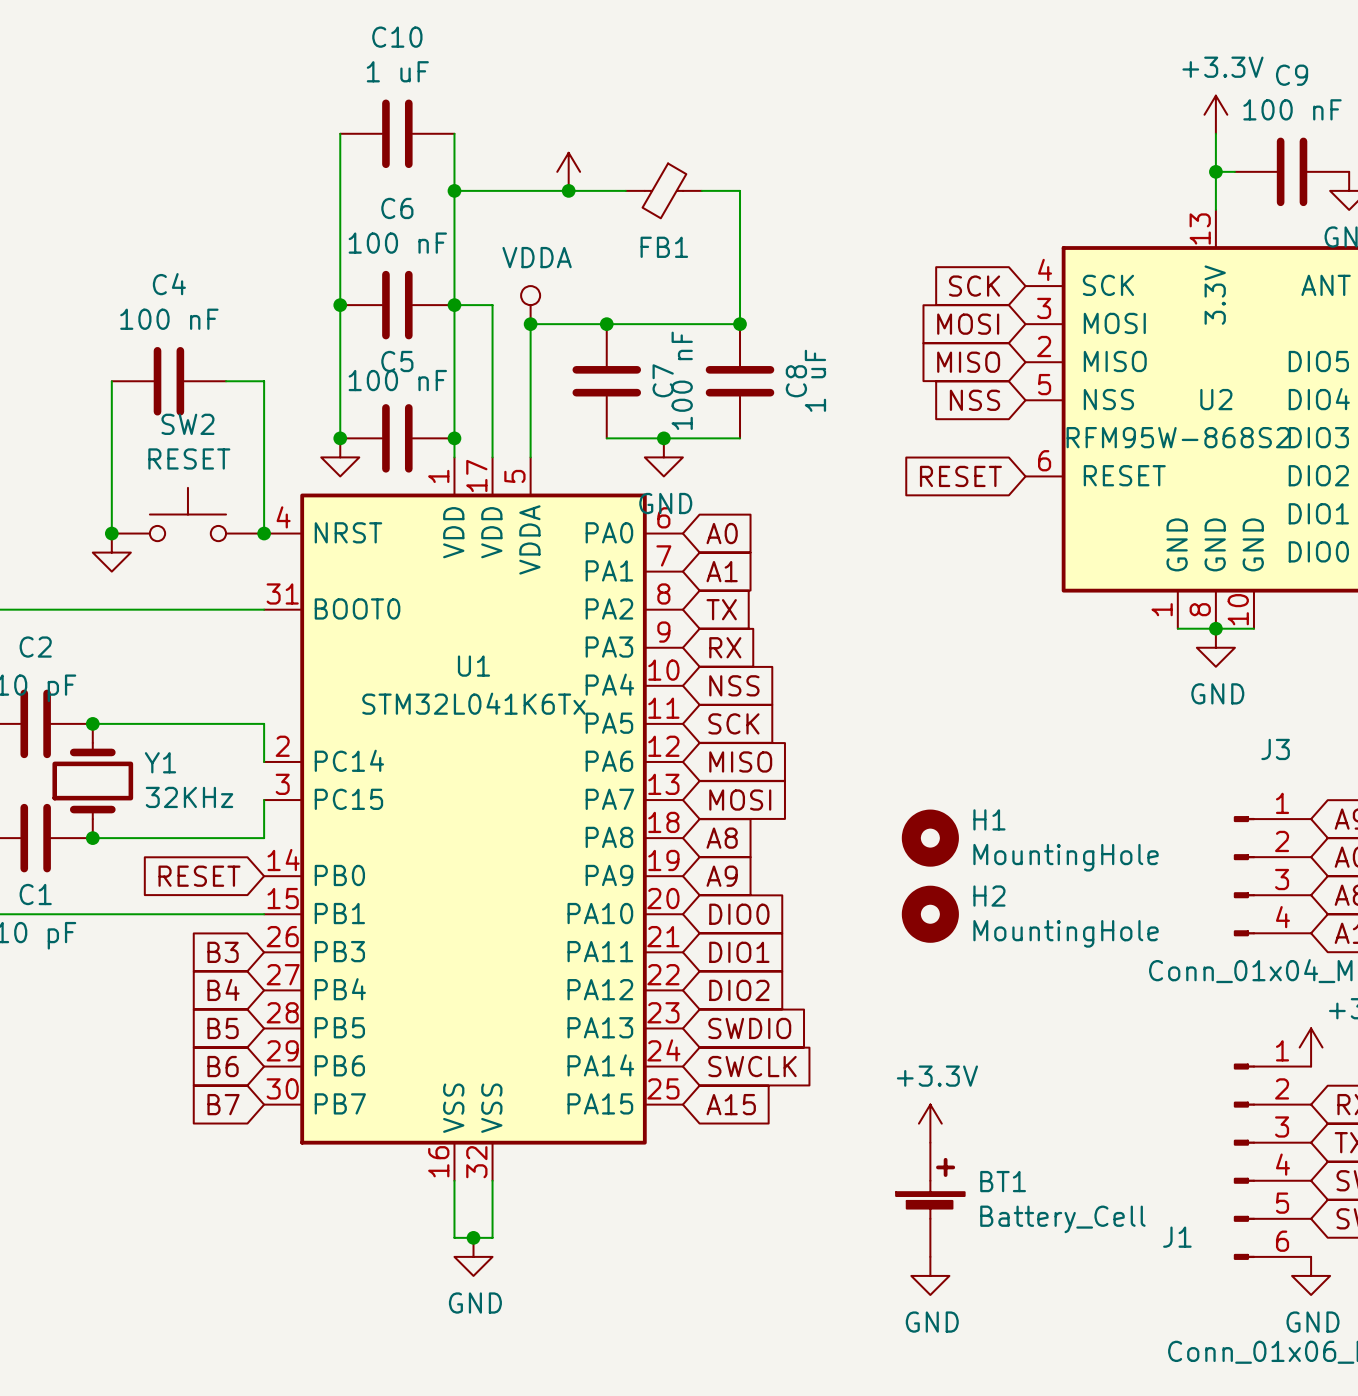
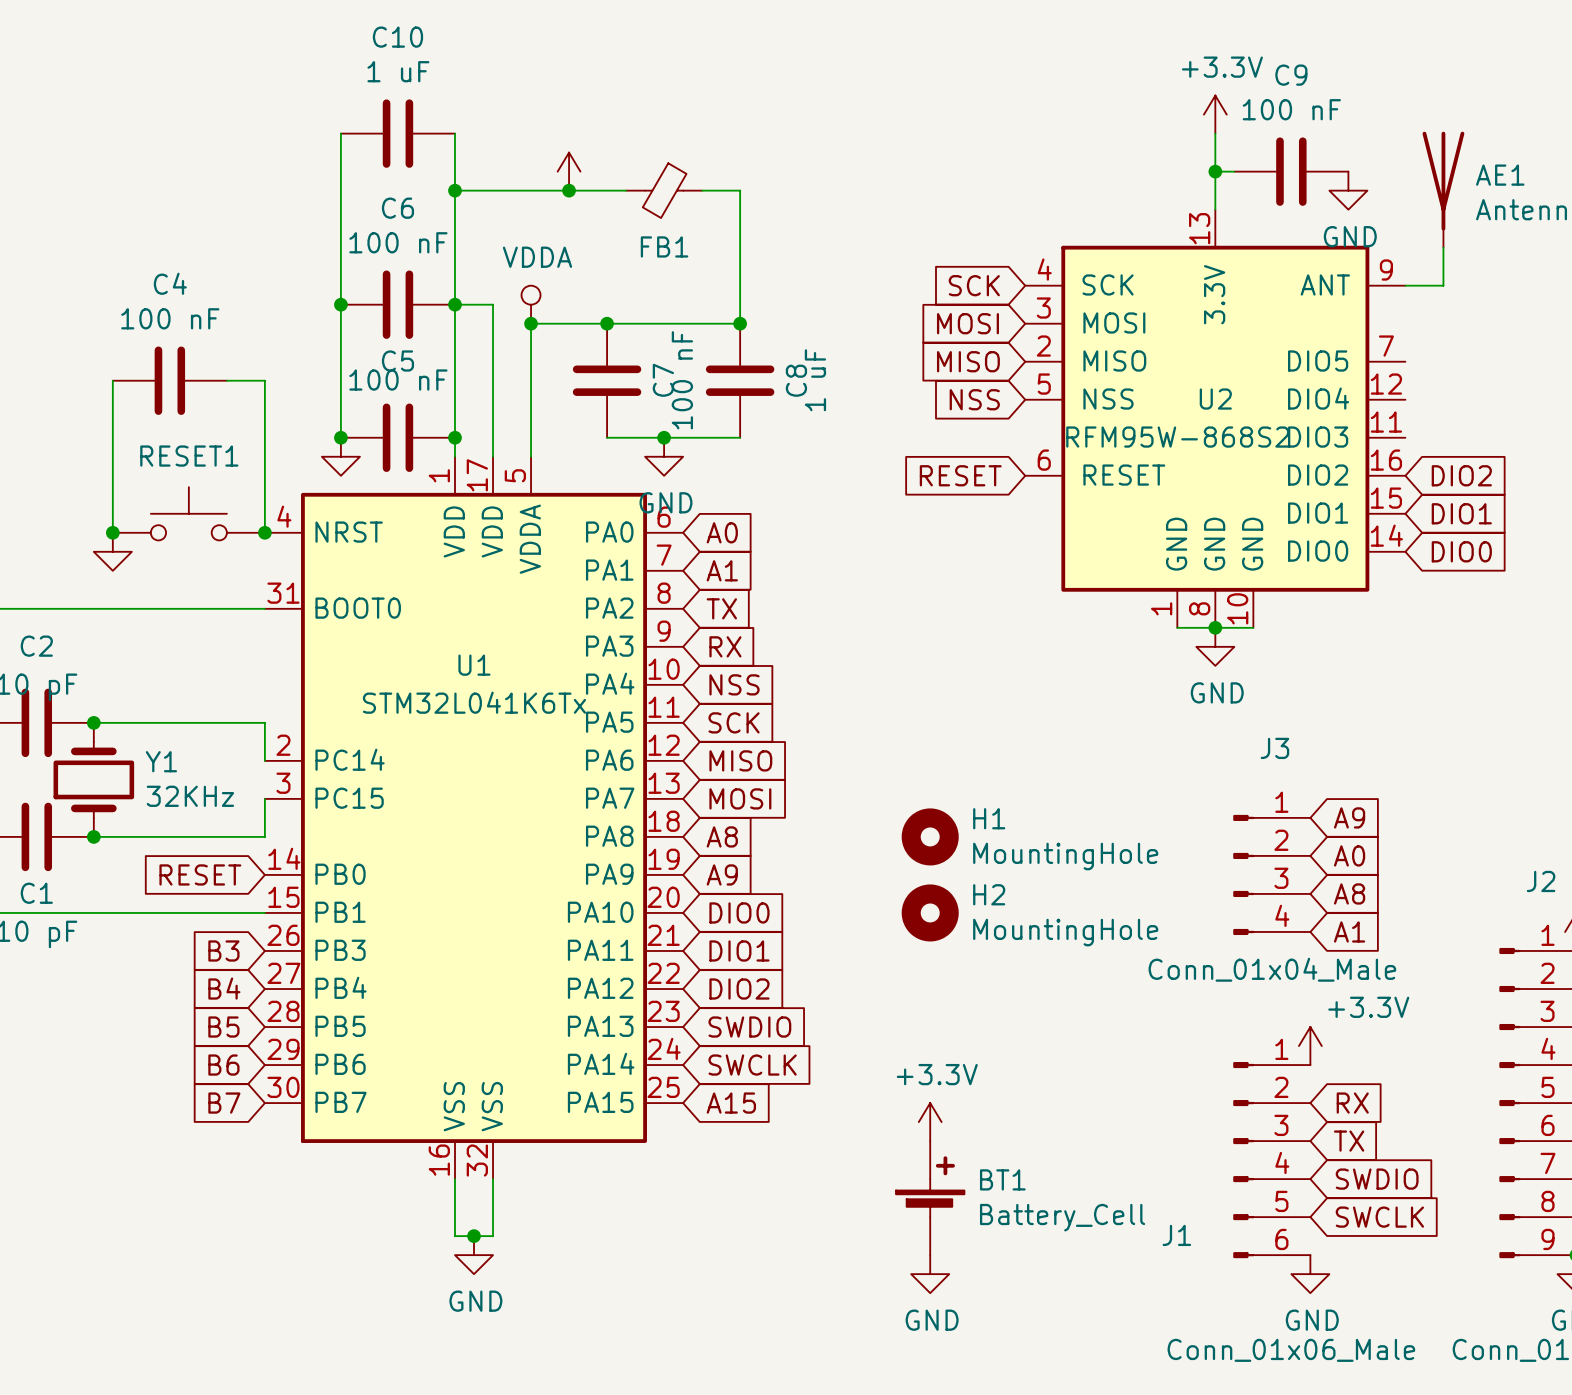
SW2 name: SW2 (187, 424) -> RESET1 (189, 456)
SW2 value: RESET (189, 458) -> none

